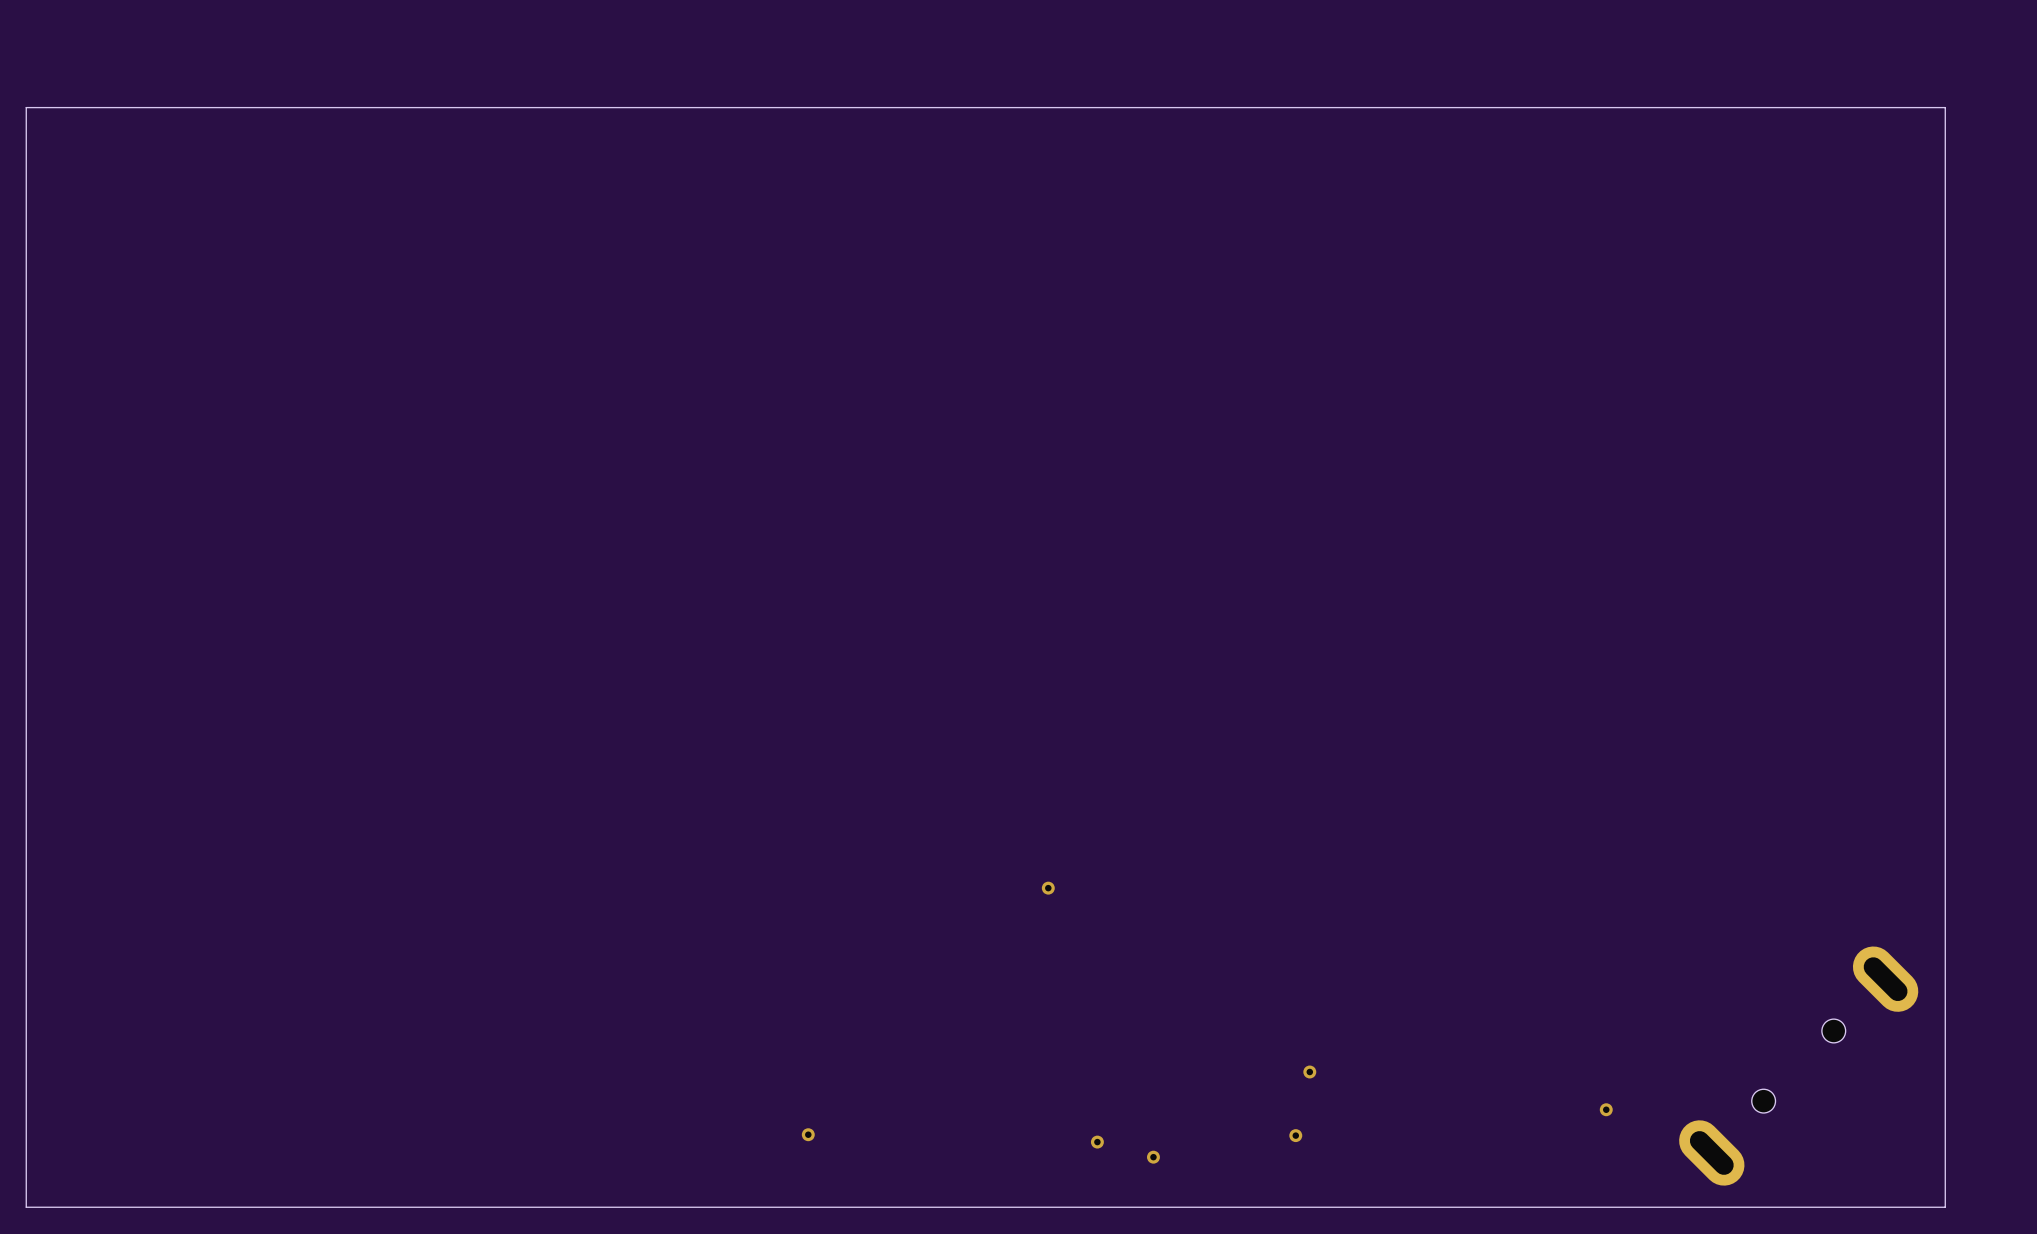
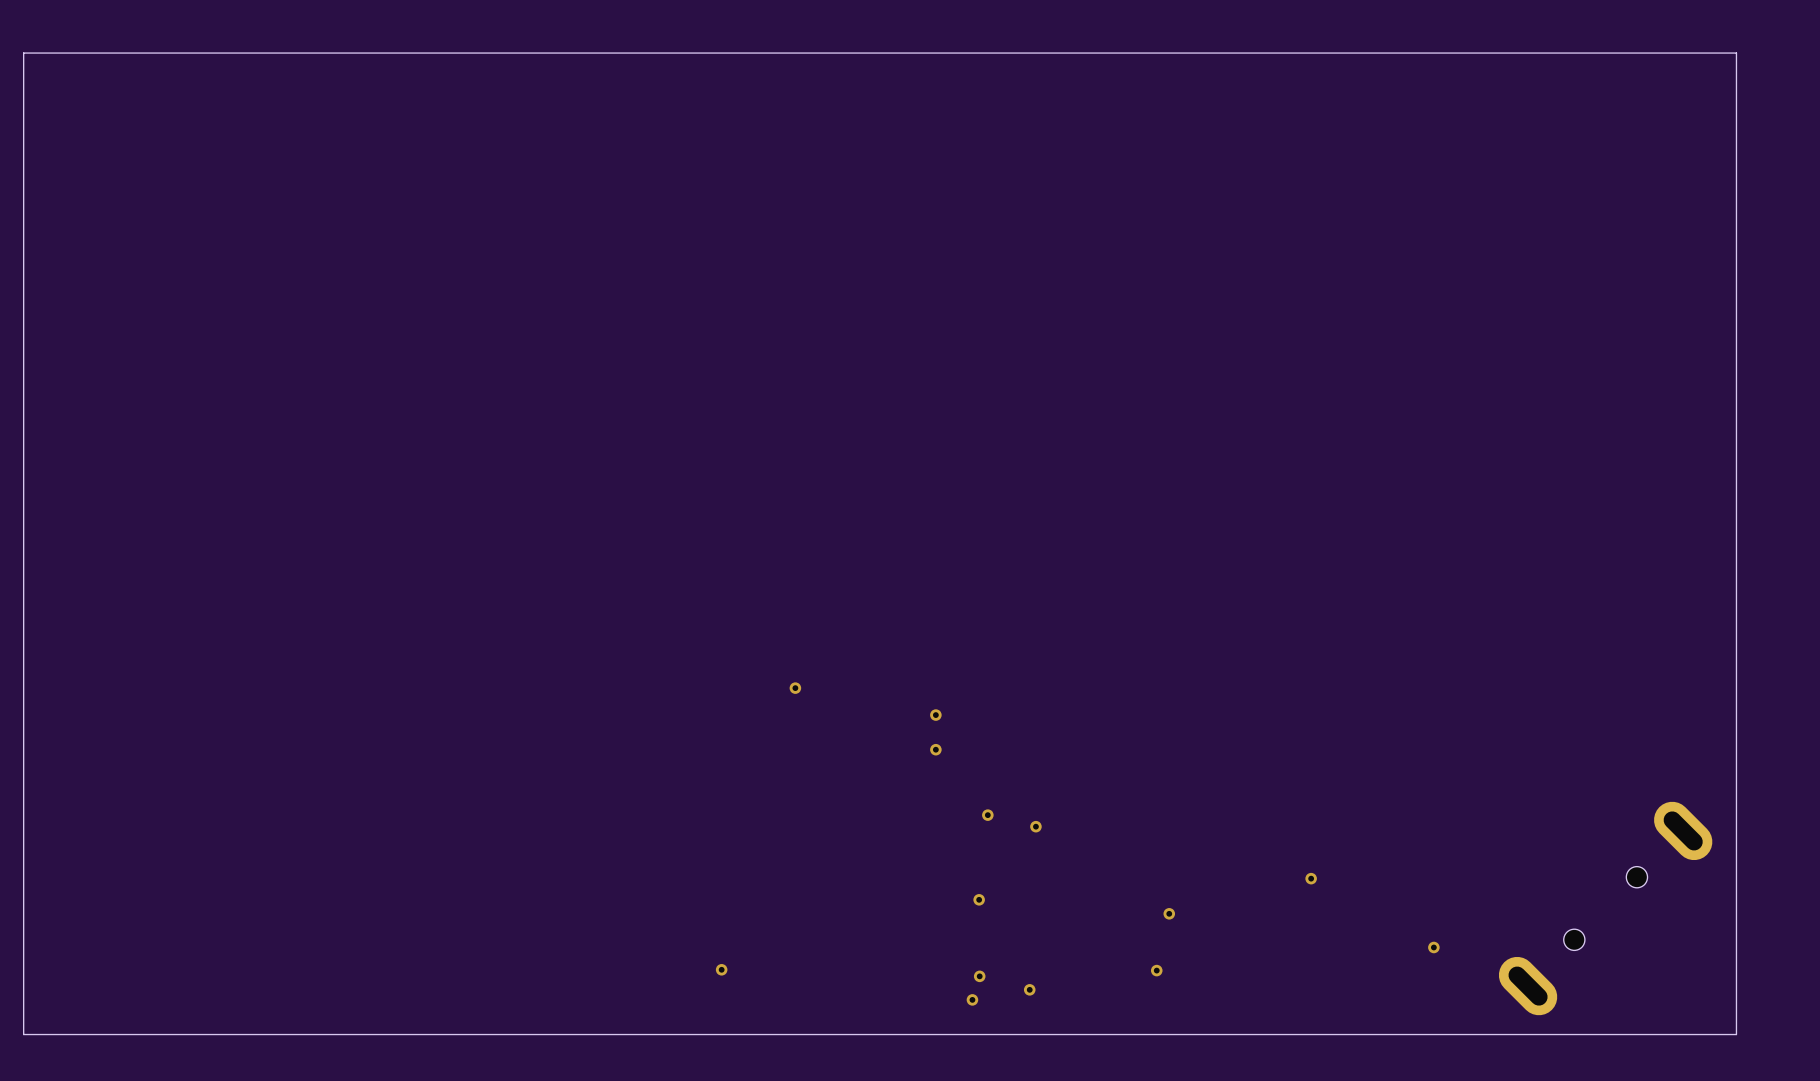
via: none -> (795, 688)
via: none -> (935, 715)
via: none -> (987, 815)
via: none -> (1035, 826)
via: none -> (1311, 878)
via: none -> (979, 899)
via: none -> (972, 999)

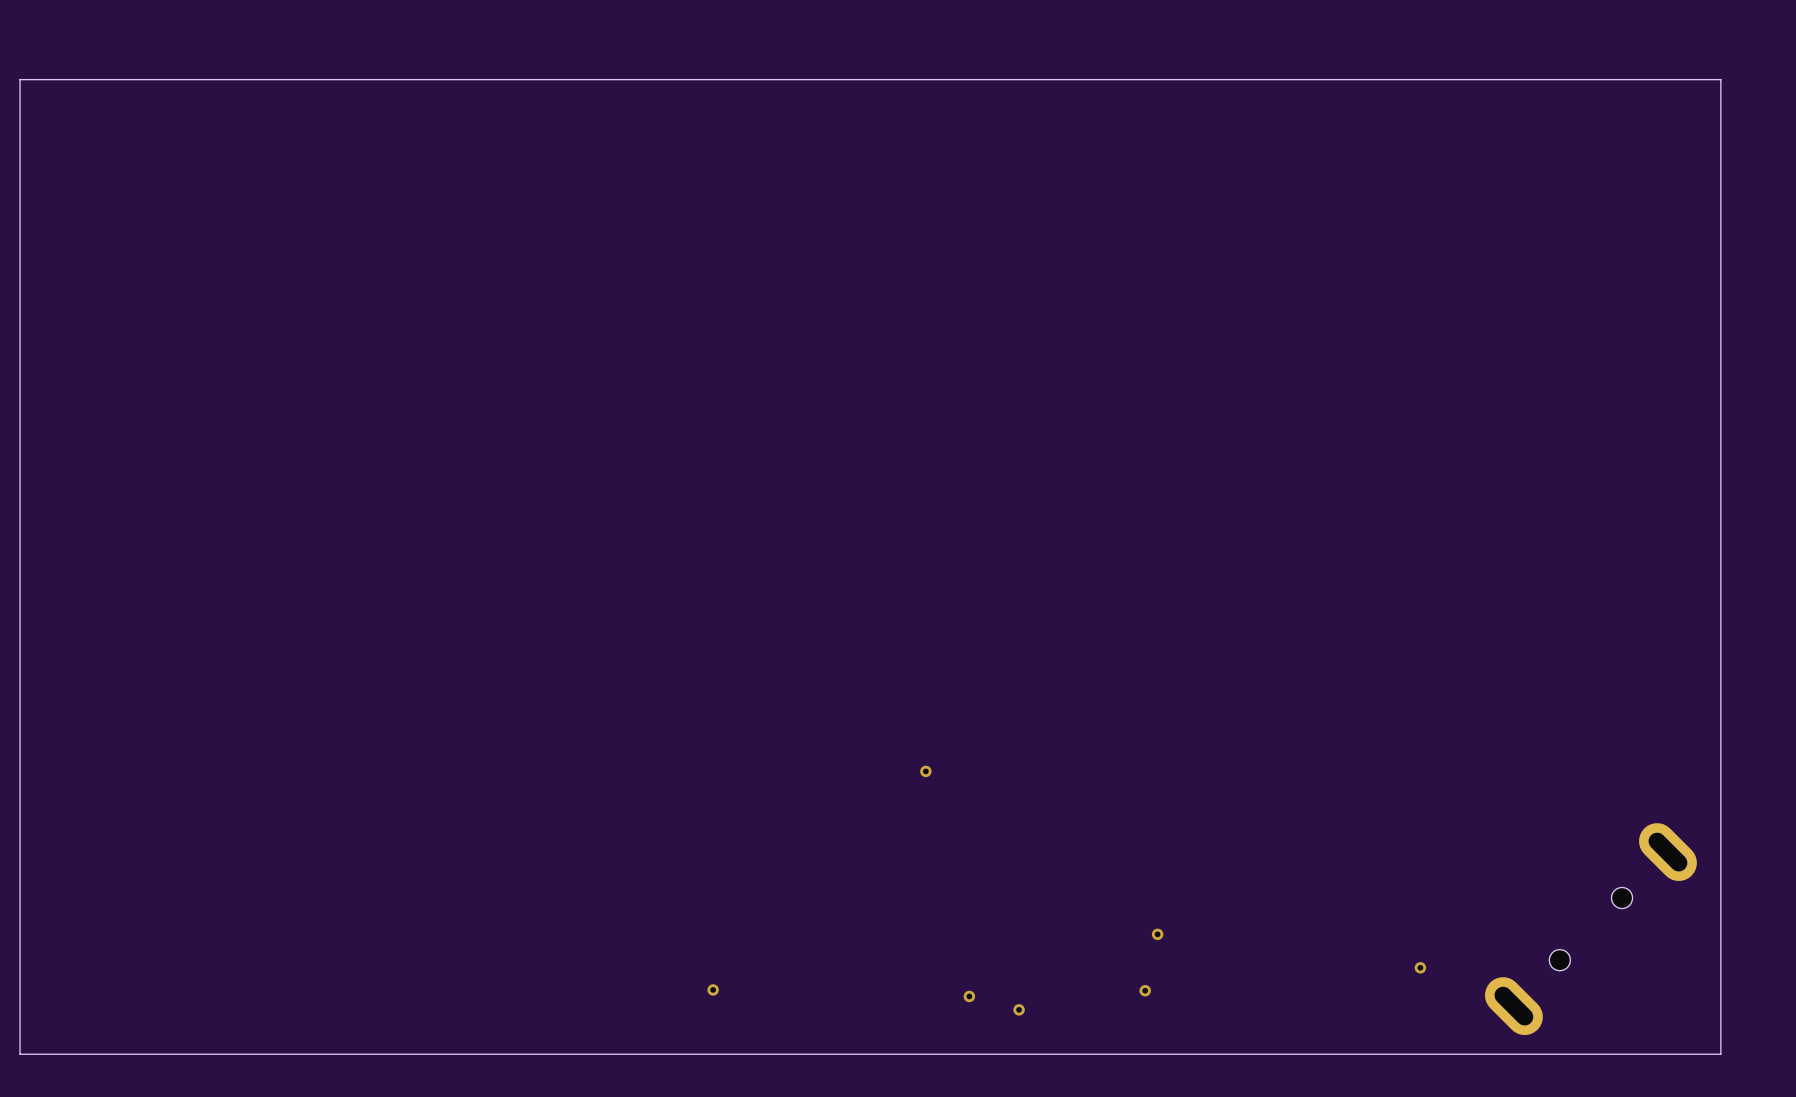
via: (795, 688) -> none
via: (935, 715) -> none
via: (987, 815) -> none
via: (1035, 826) -> none
via: (1311, 878) -> none
via: (979, 899) -> none
via: (972, 999) -> none

